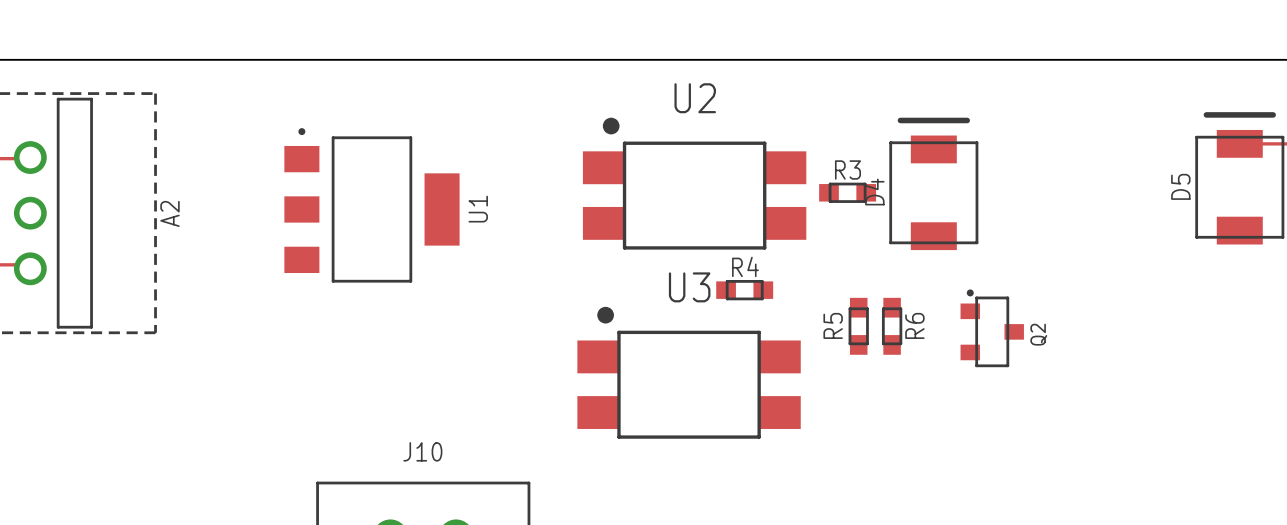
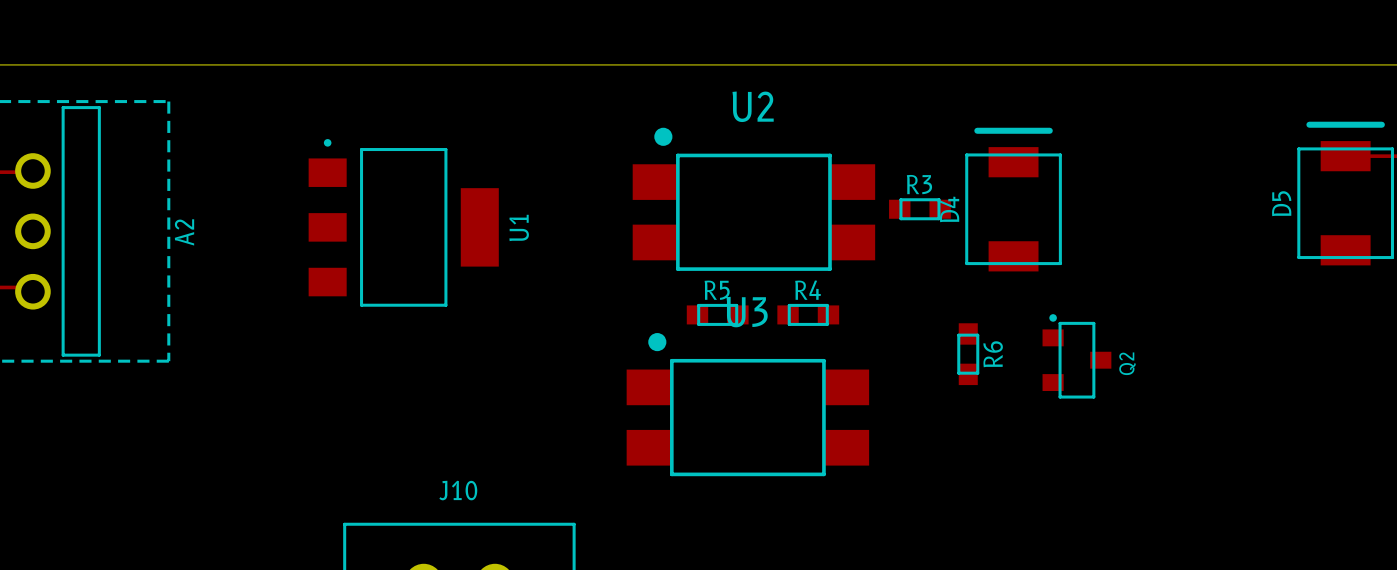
R5 rotation: 0° (858, 326) -> 90° clockwise (717, 314)
R5 position: (858, 326) -> (717, 314)

